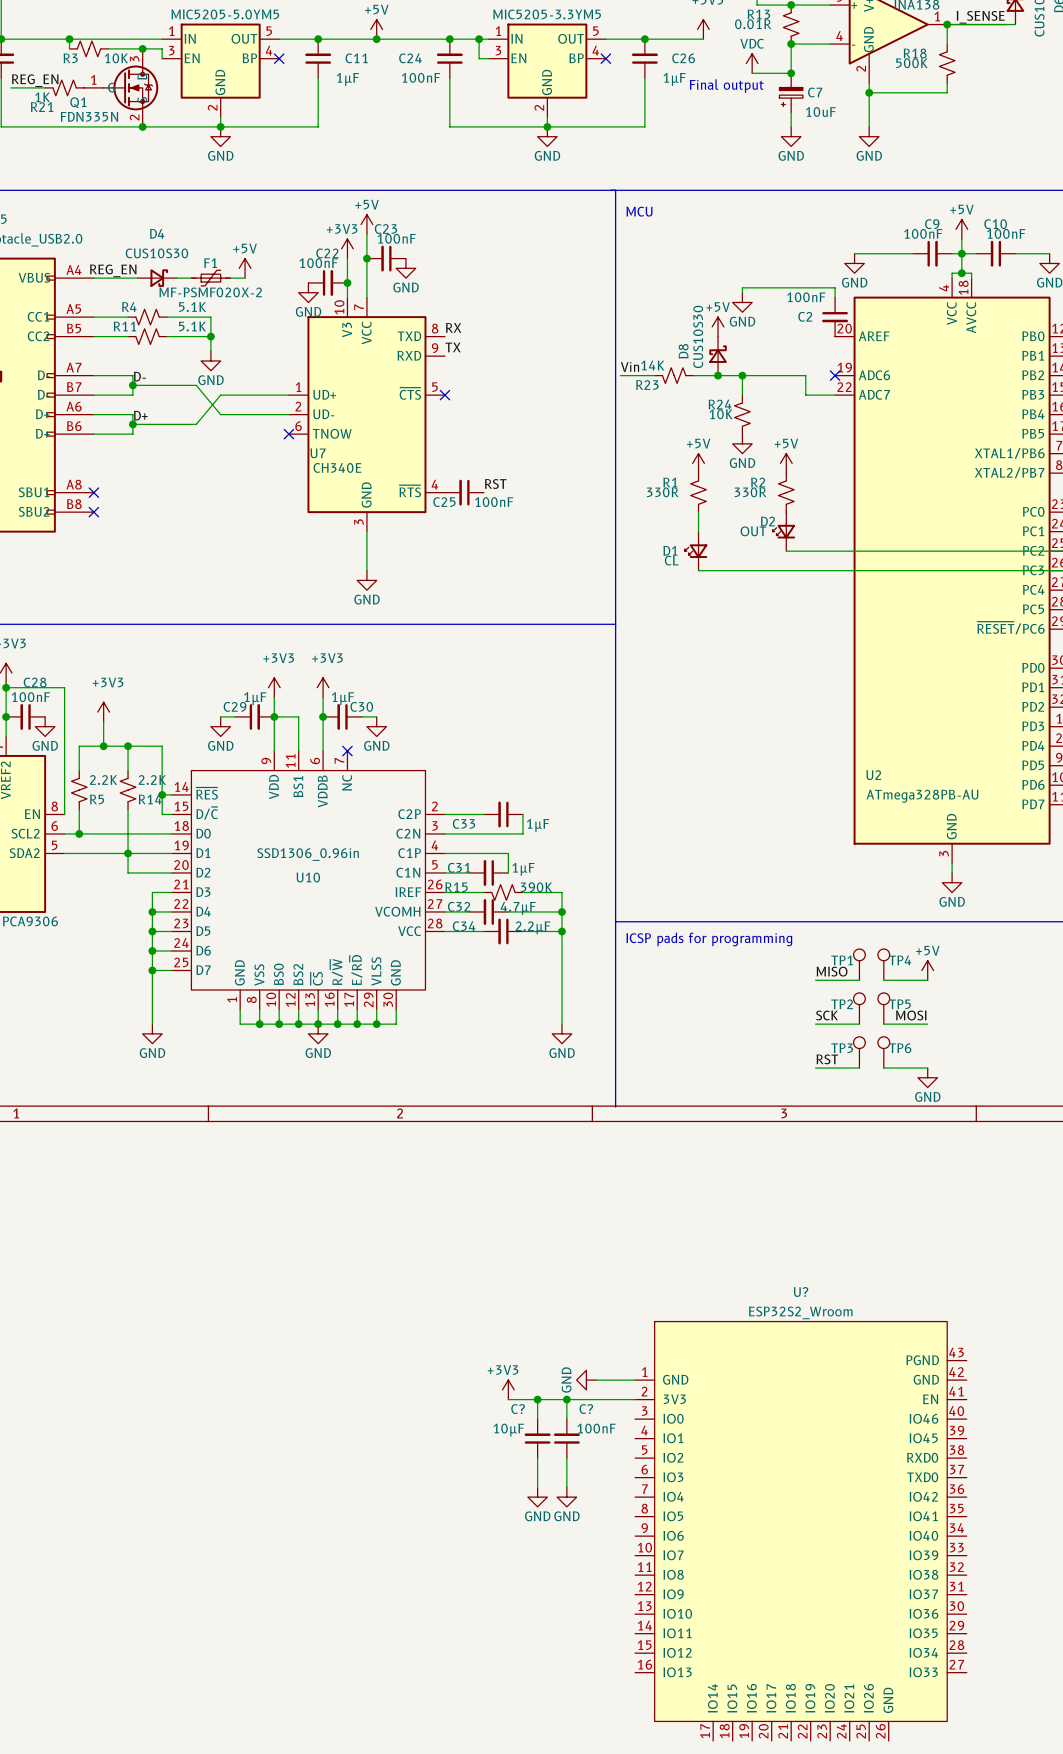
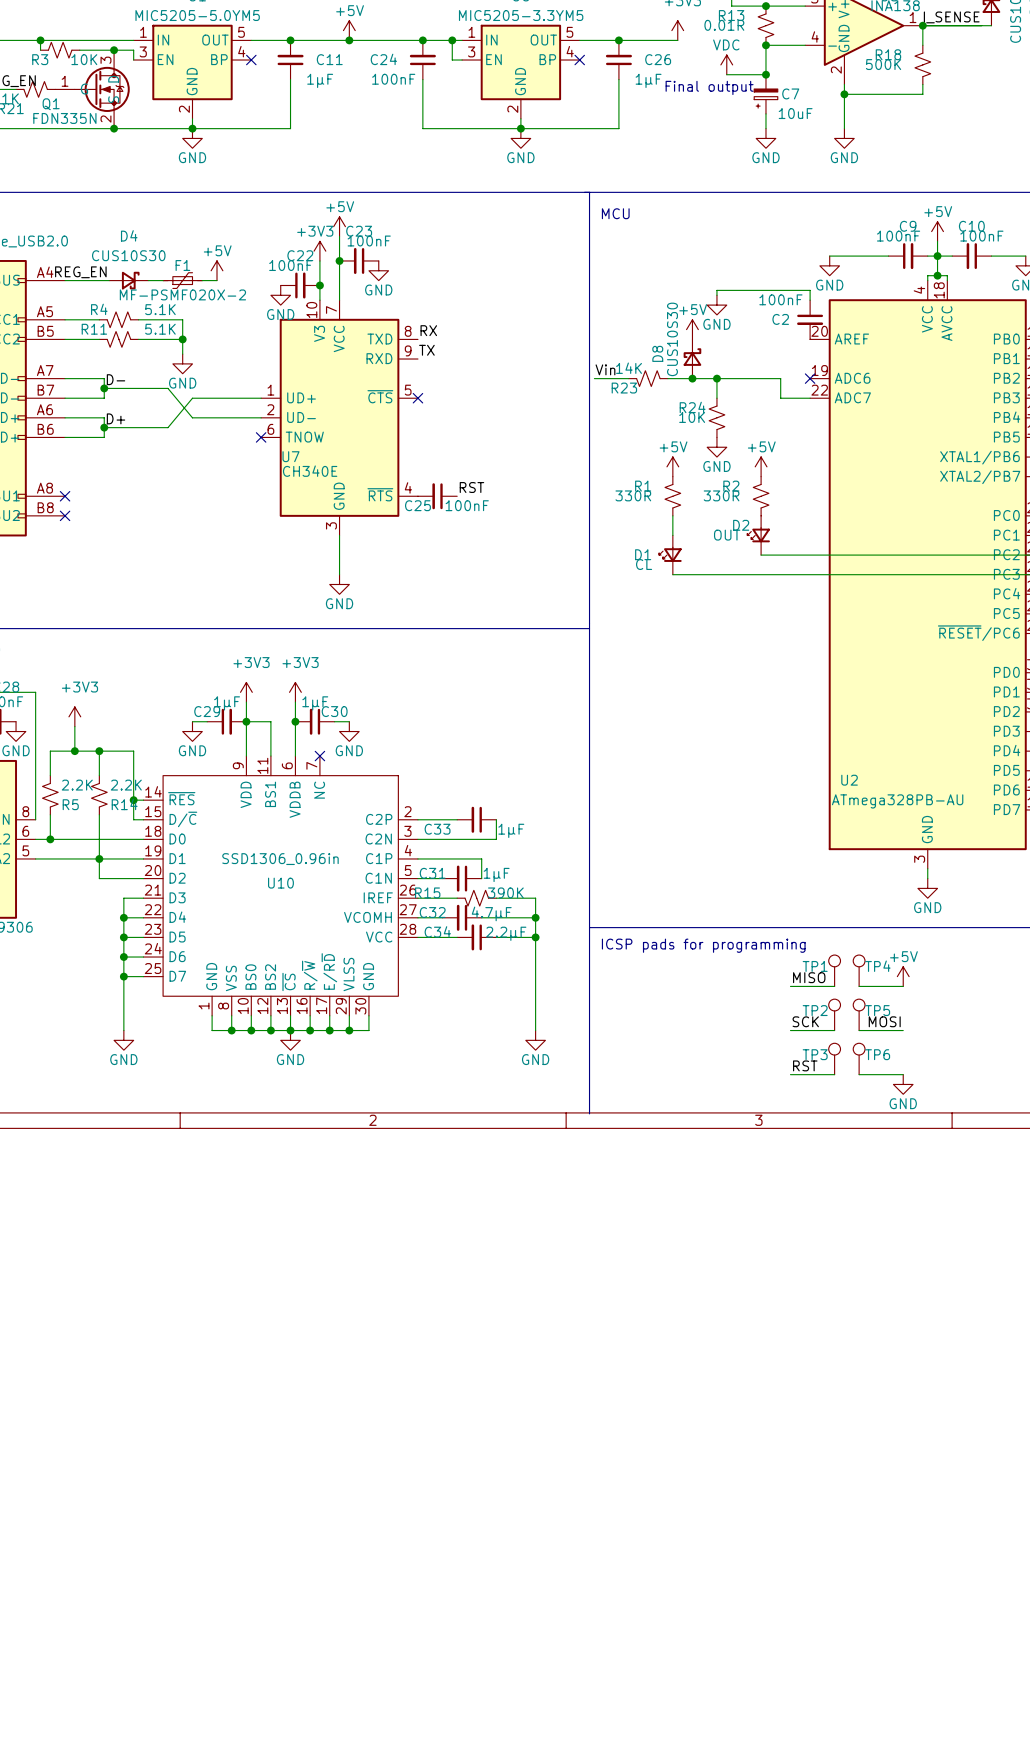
power symbol: GND (586, 1380) -> none
wire: (596, 1380) (635, 1380) -> none
power symbol: +3V3 (508, 1389) -> none
wire: (508, 1399) (635, 1399) -> none
wire: (537, 1399) (537, 1419) -> none
junction: (537, 1399) -> none
wire: (566, 1399) (566, 1419) -> none
junction: (566, 1399) -> none
C?: 10µF (537, 1438) -> none
C?: 100nF (566, 1438) -> none
wire: (537, 1458) (537, 1487) -> none
wire: (566, 1458) (566, 1487) -> none
power symbol: GND (537, 1497) -> none
power symbol: GND (566, 1497) -> none
U?: ESP32S2_Wroom (800, 1531) -> none

